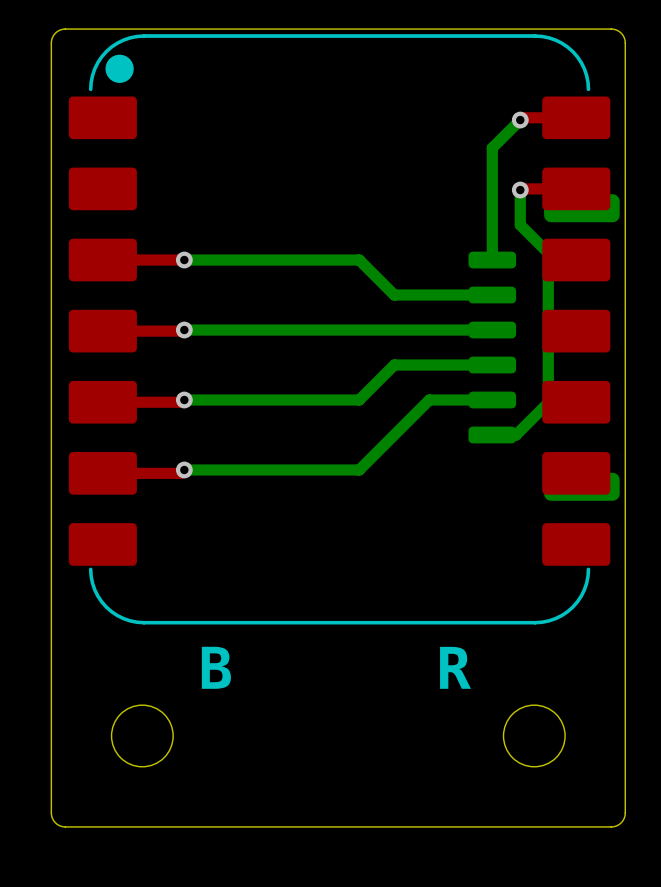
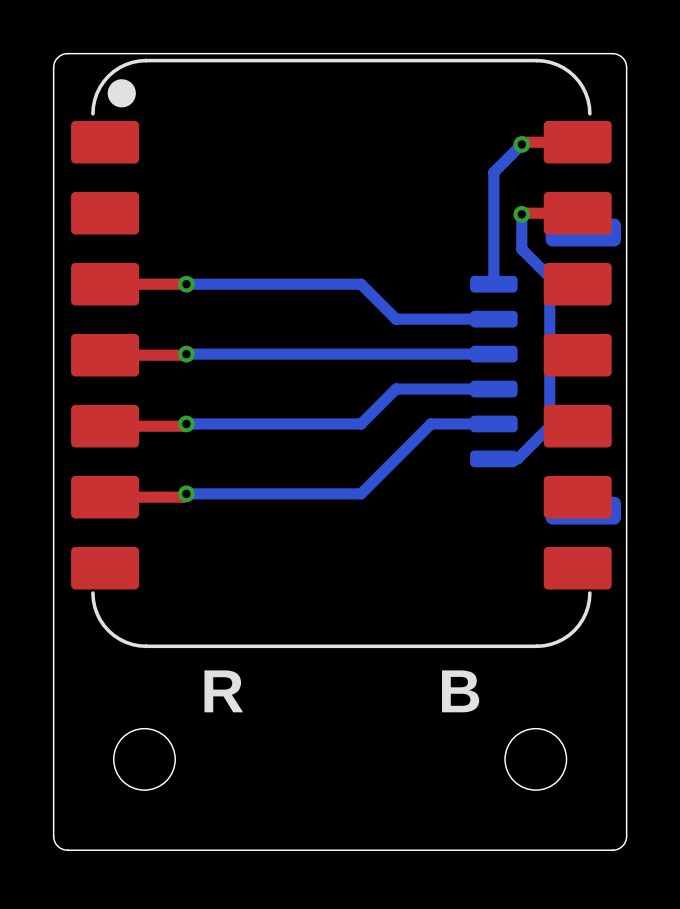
text: B (216, 667) -> R (223, 691)
text: R (455, 667) -> B (460, 691)

